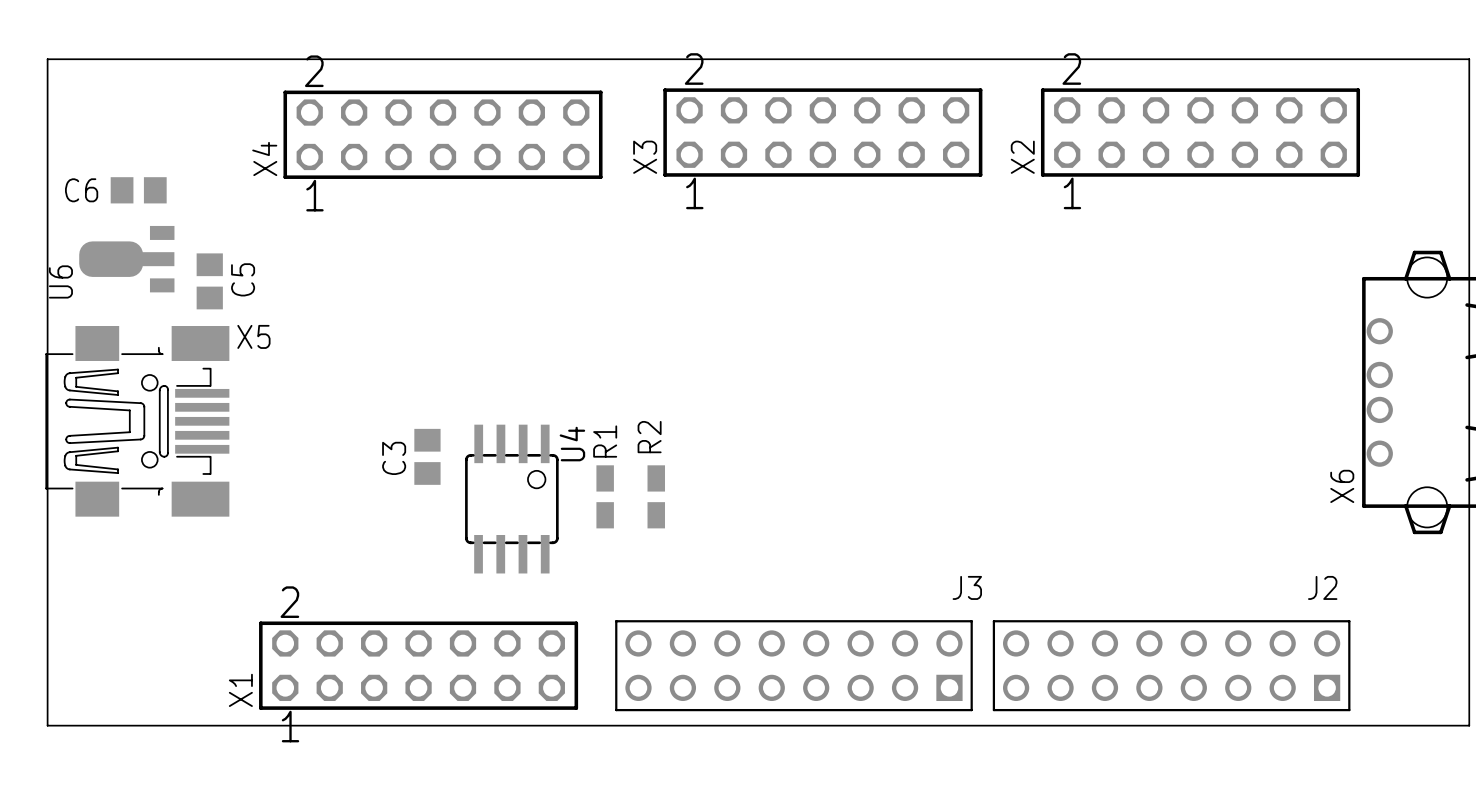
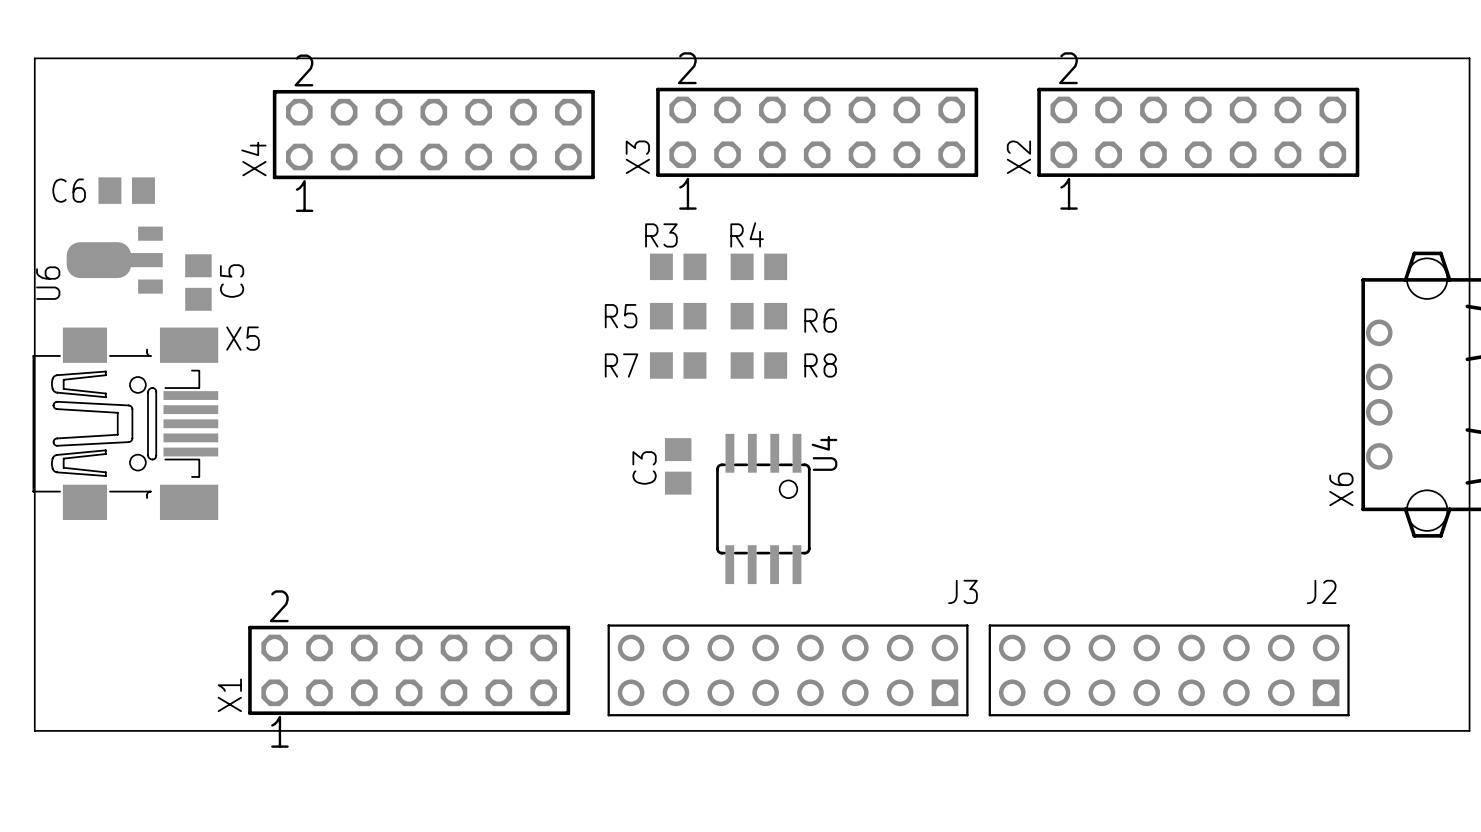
R3: none -> (678, 266)
R4: none -> (758, 266)
R5: none -> (678, 316)
R6: none -> (758, 316)
R7: none -> (678, 365)
R8: none -> (758, 365)
C3 position: (427, 456) -> (678, 466)
R1: (605, 496) -> none
R2: (656, 496) -> none
U4 position: (511, 499) -> (763, 508)

